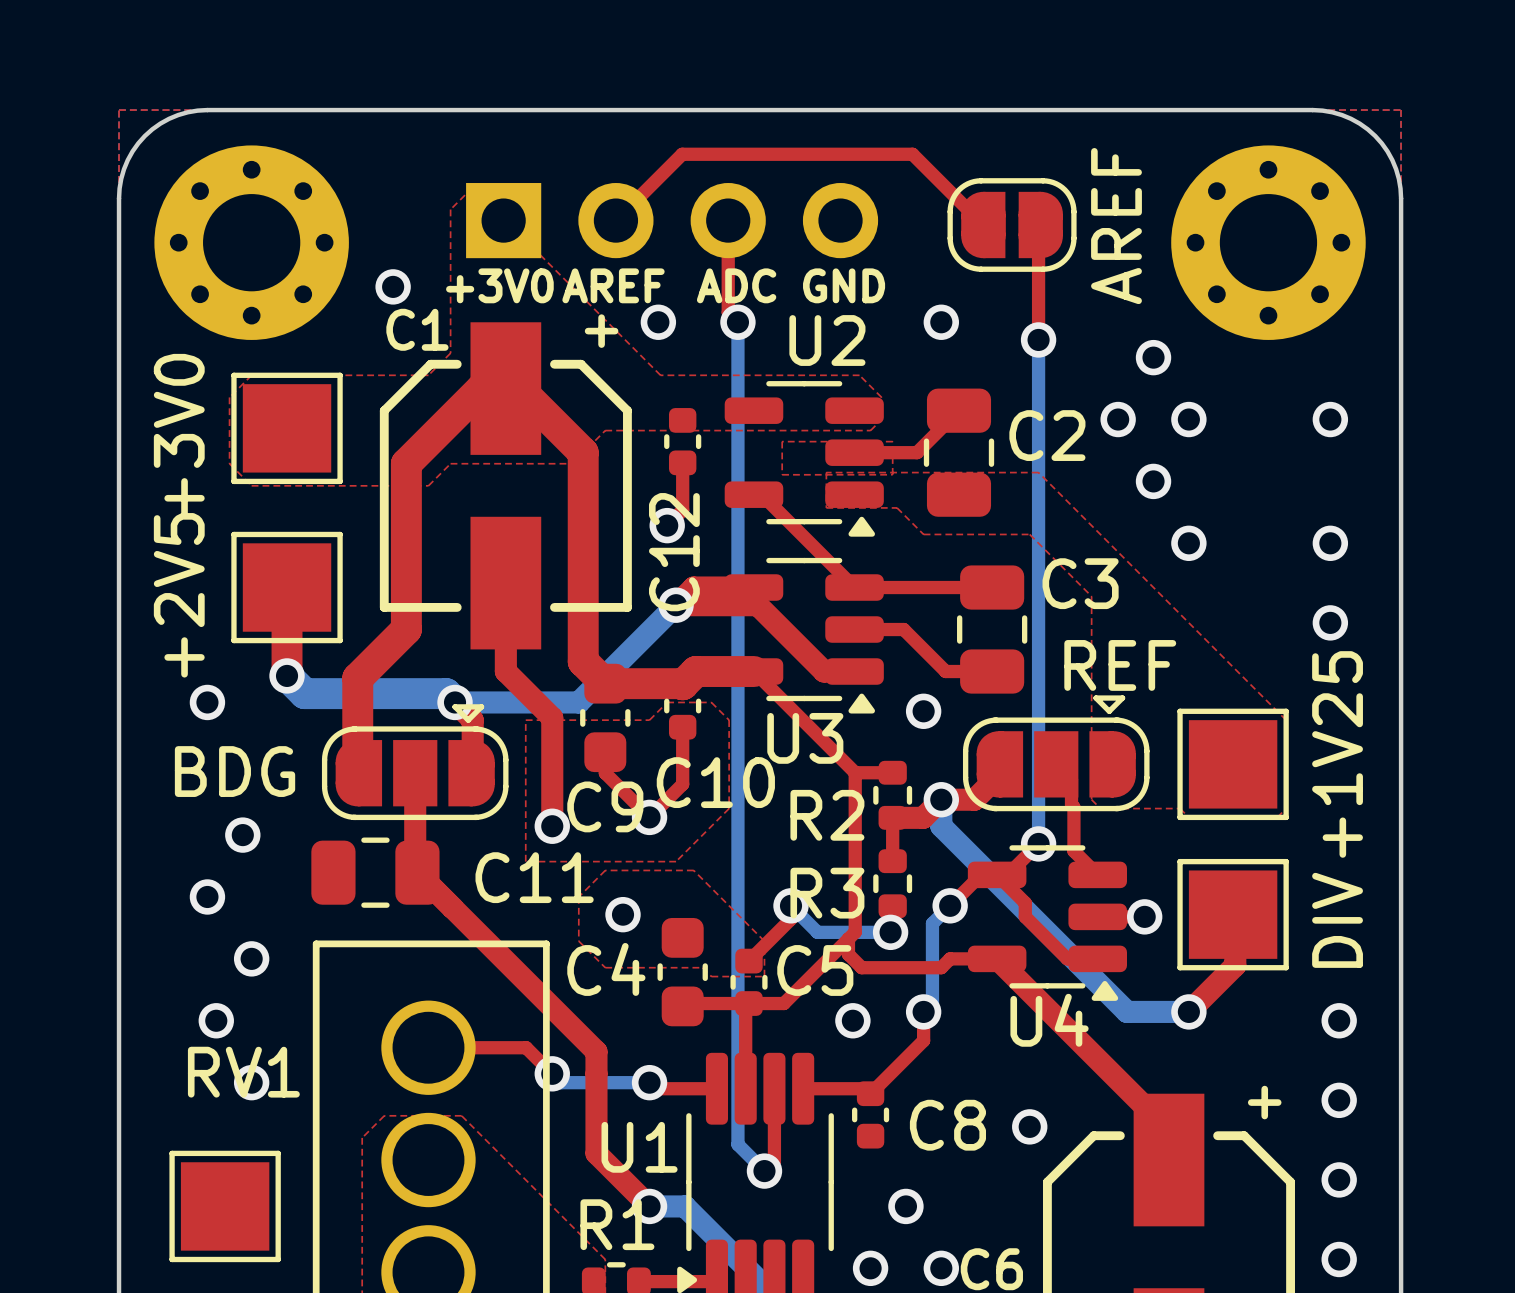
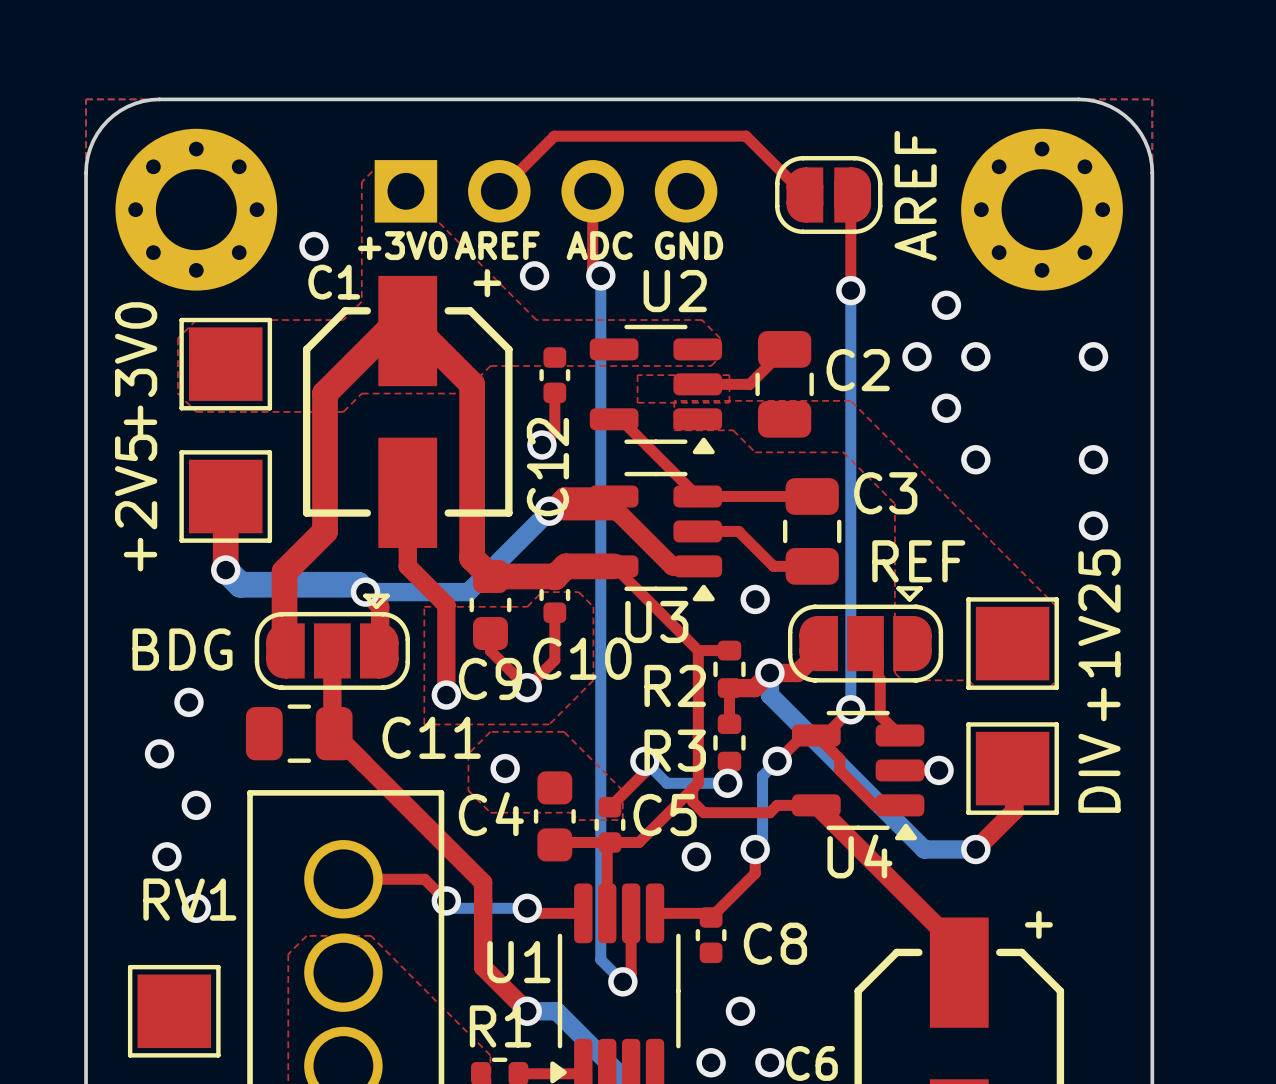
via: (941, 322) -> none
via: (207, 702) -> none
via: (1339, 1020) -> none
via: (1339, 1100) -> none
via: (1029, 1126) -> none
via: (1339, 1179) -> none
via: (1339, 1259) -> none

